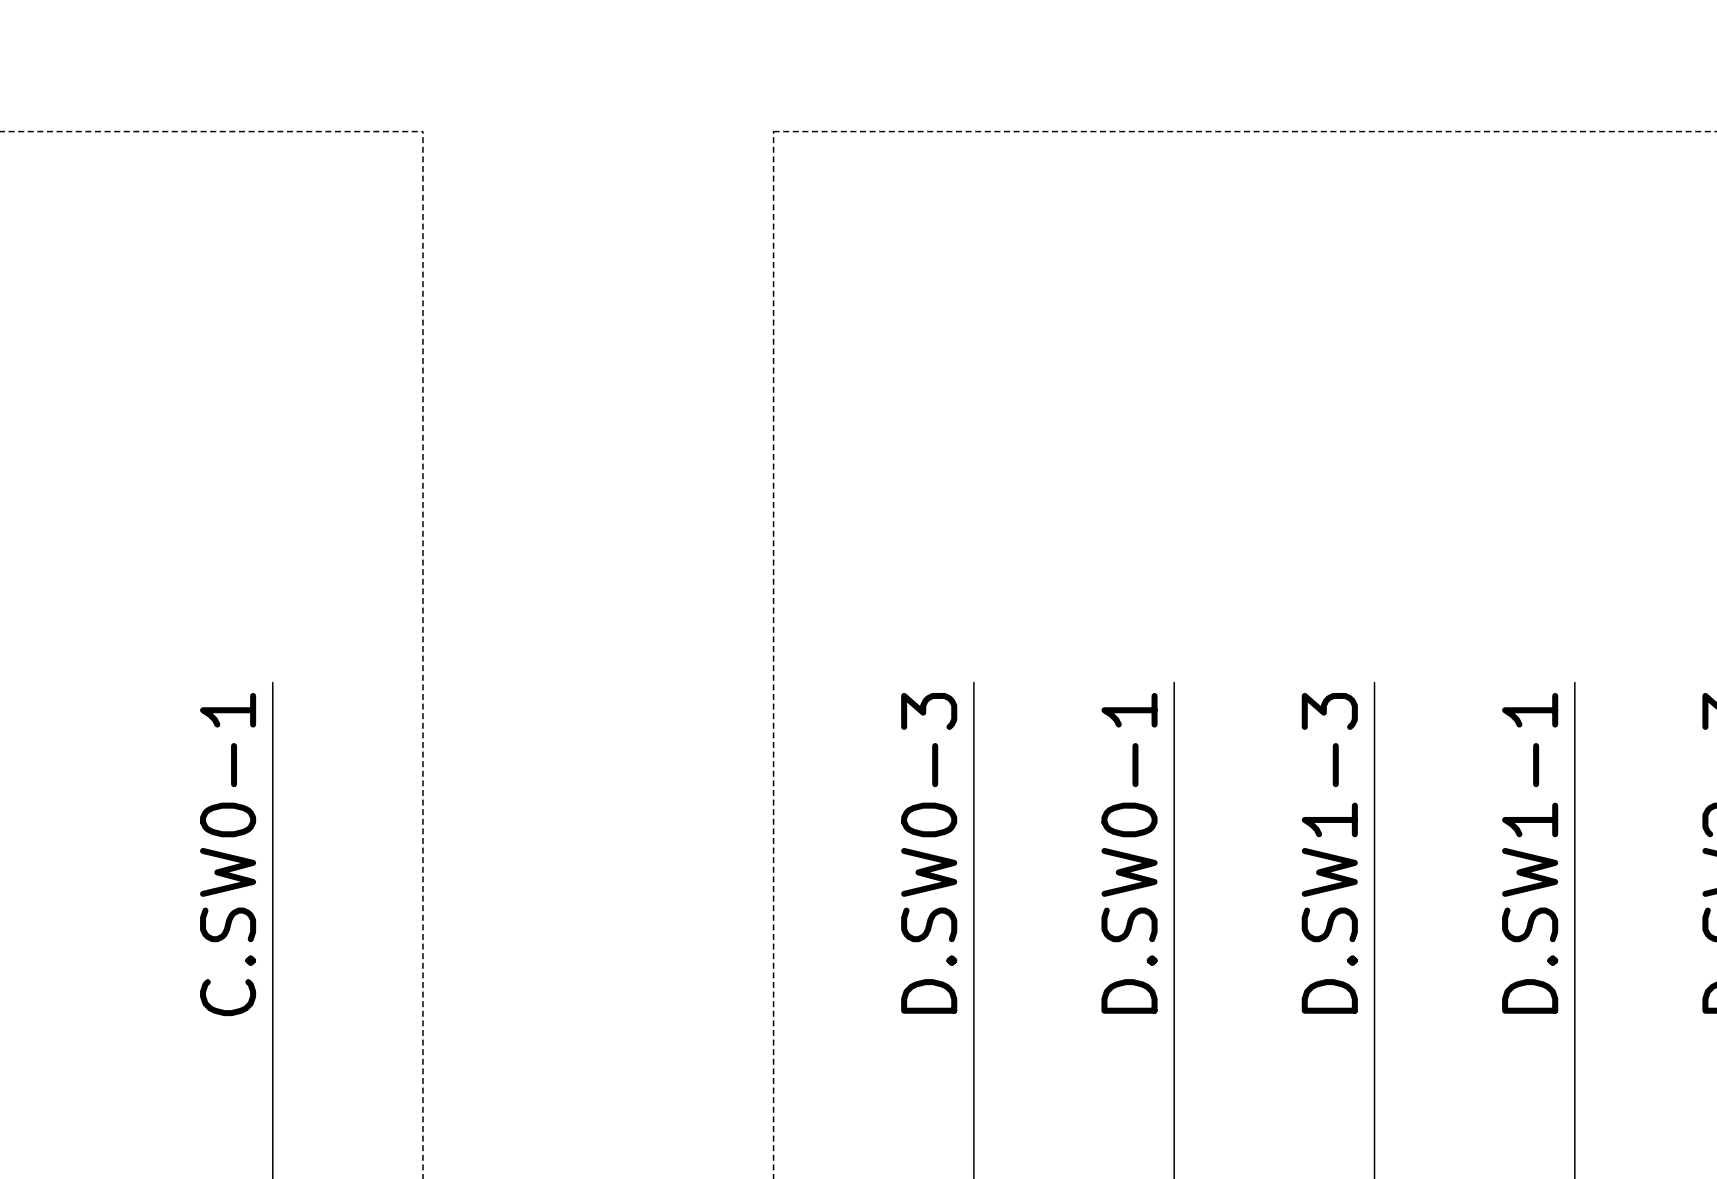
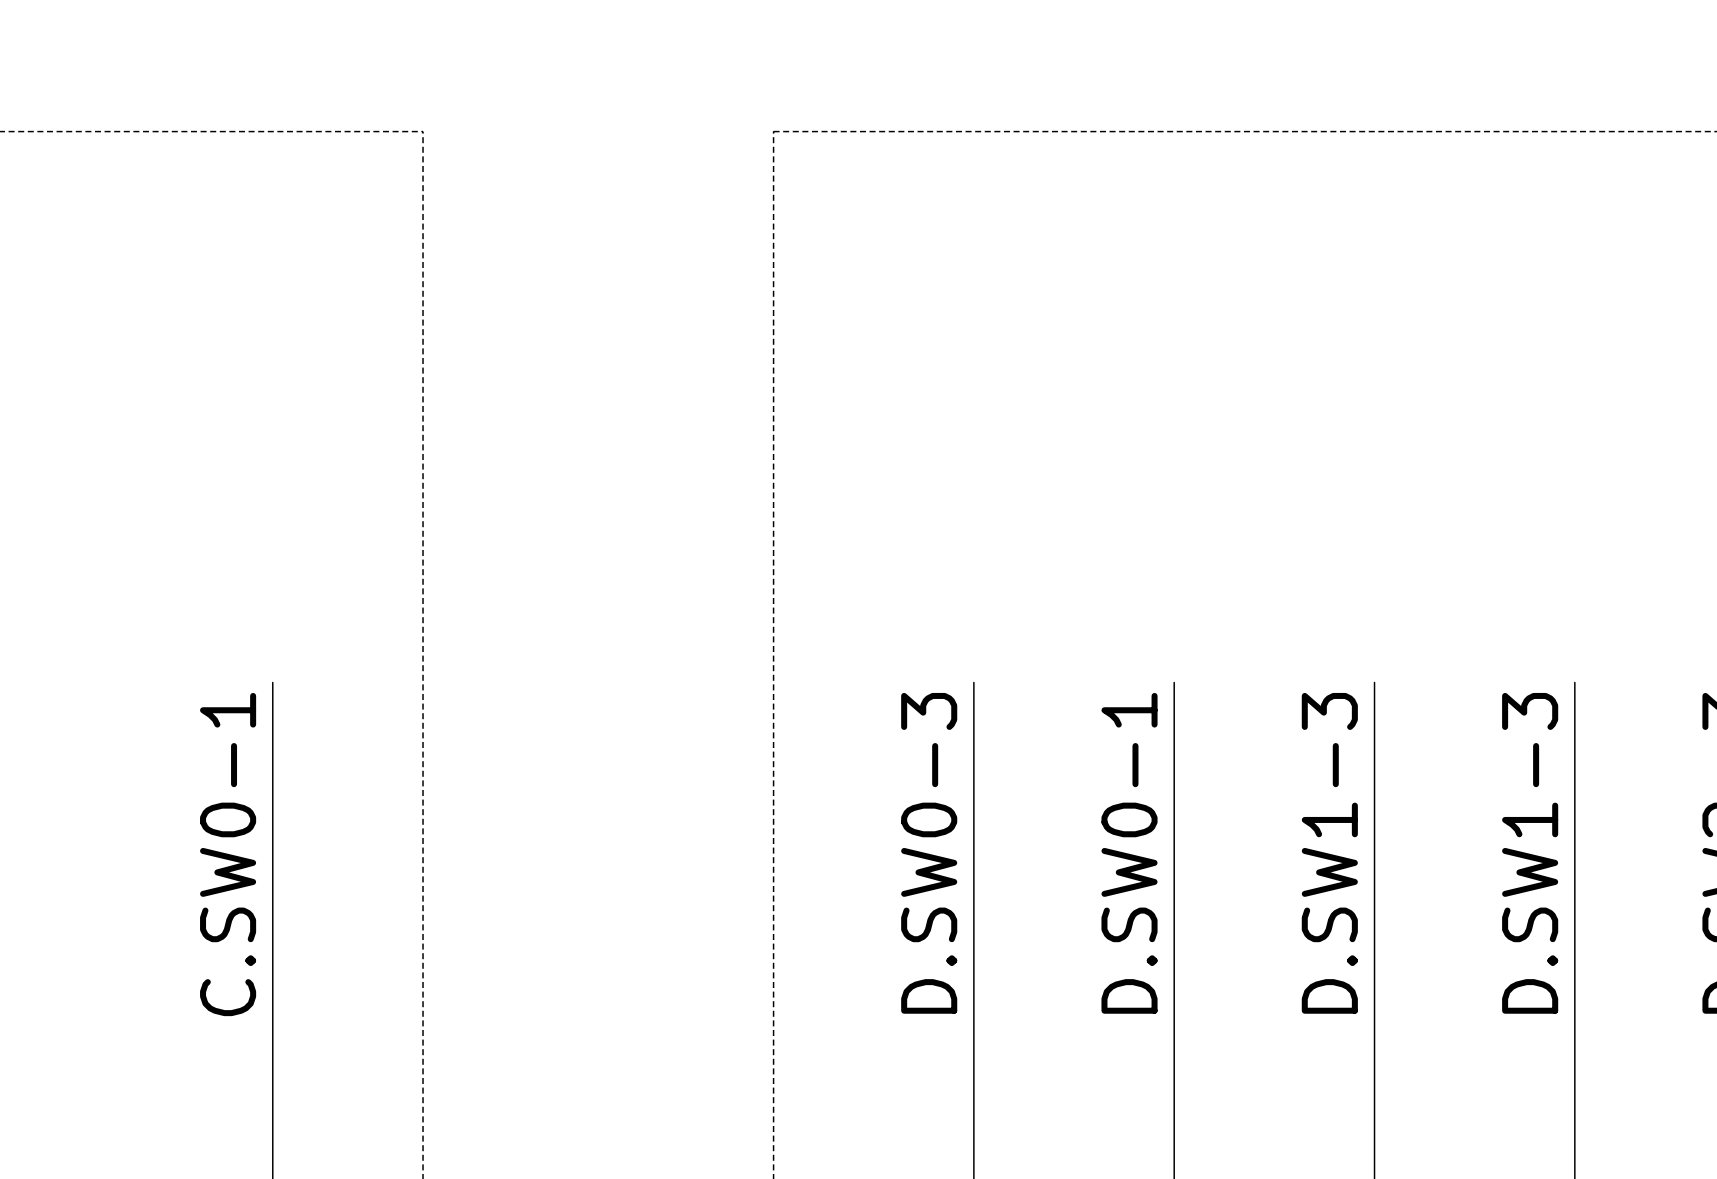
label: D.SW1-1 (1530, 853) -> D.SW1-3 (1530, 853)

